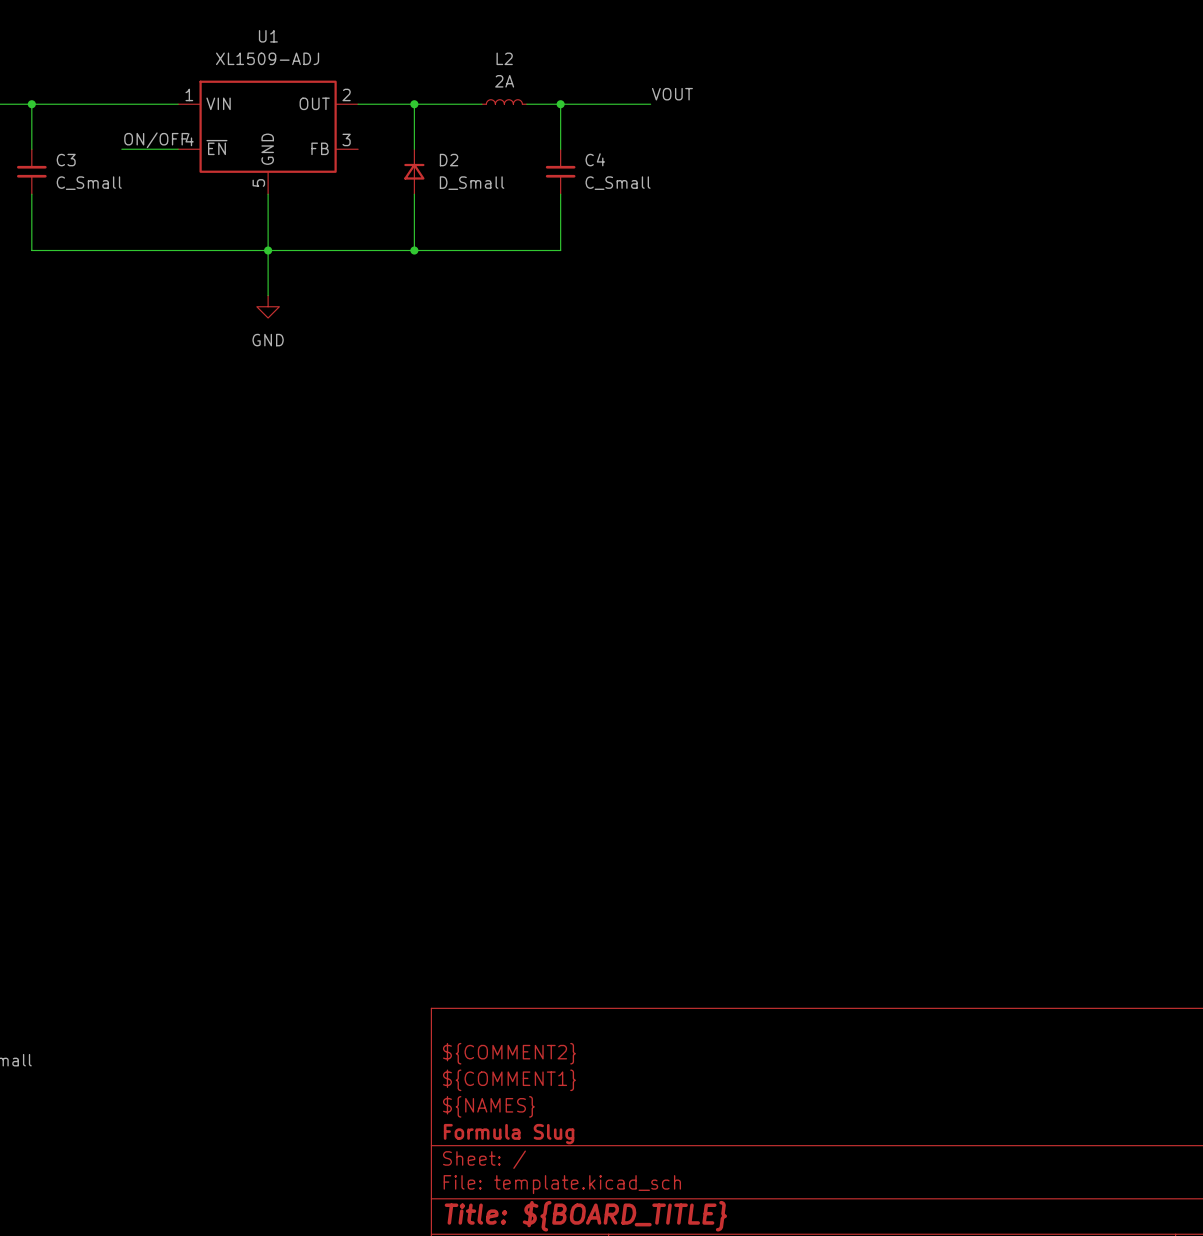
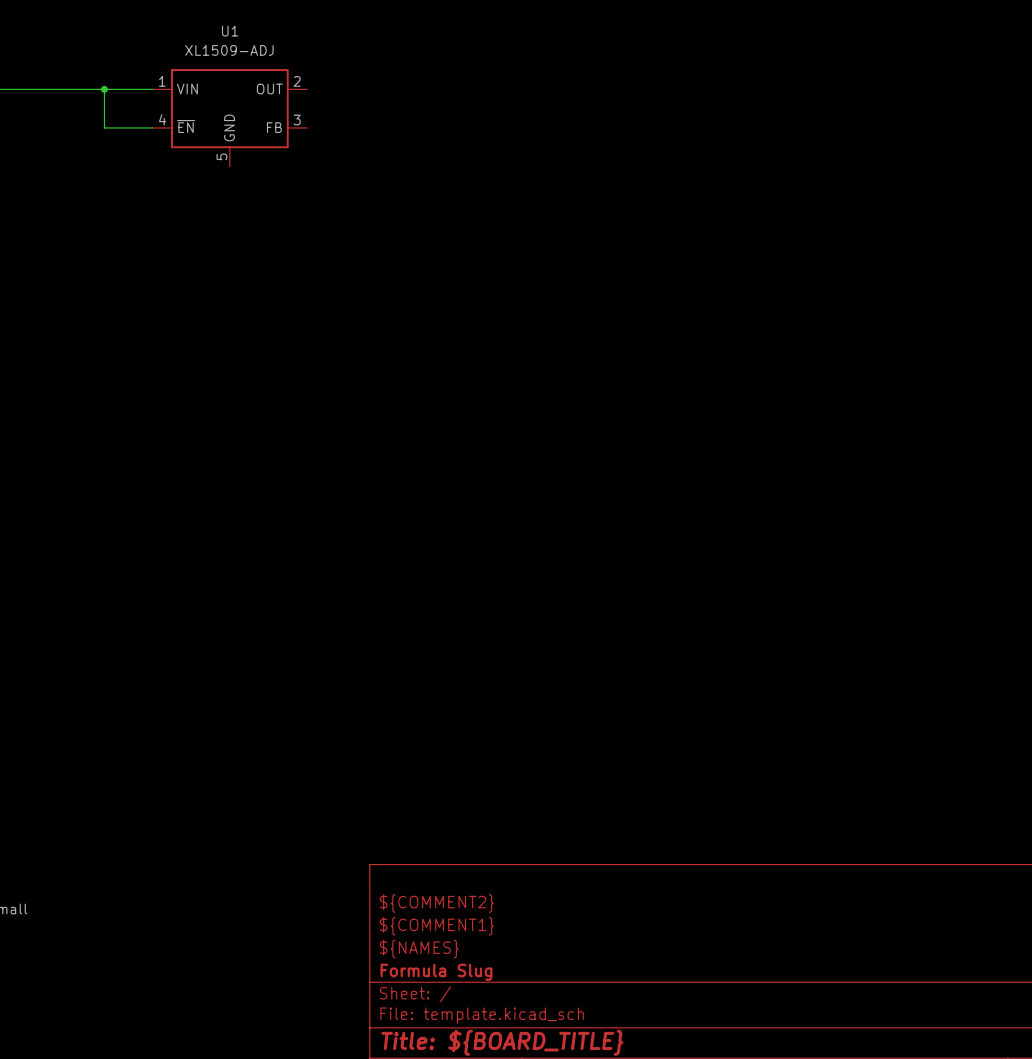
label: VOUT (672, 94) -> none
L2: 2A (504, 101) -> none
wire: (31, 104) (31, 149) -> (104, 89) (104, 127)
junction: (31, 104) -> none
junction: none -> (104, 89)
wire: (358, 104) (481, 104) -> none
wire: (414, 104) (414, 149) -> none
junction: (414, 104) -> none
wire: (526, 104) (650, 104) -> none
wire: (560, 104) (560, 149) -> none
junction: (560, 104) -> none
label: ON/OFF (156, 140) -> none
C3: C_Small (31, 171) -> none
D2: D_Small (414, 171) -> none
C4: C_Small (560, 171) -> none
wire: (31, 194) (31, 250) (560, 250) (560, 194) -> none
wire: (268, 194) (268, 295) -> none
wire: (414, 194) (414, 250) -> none
junction: (268, 250) -> none
junction: (414, 250) -> none
power symbol: GND (268, 306) -> none

